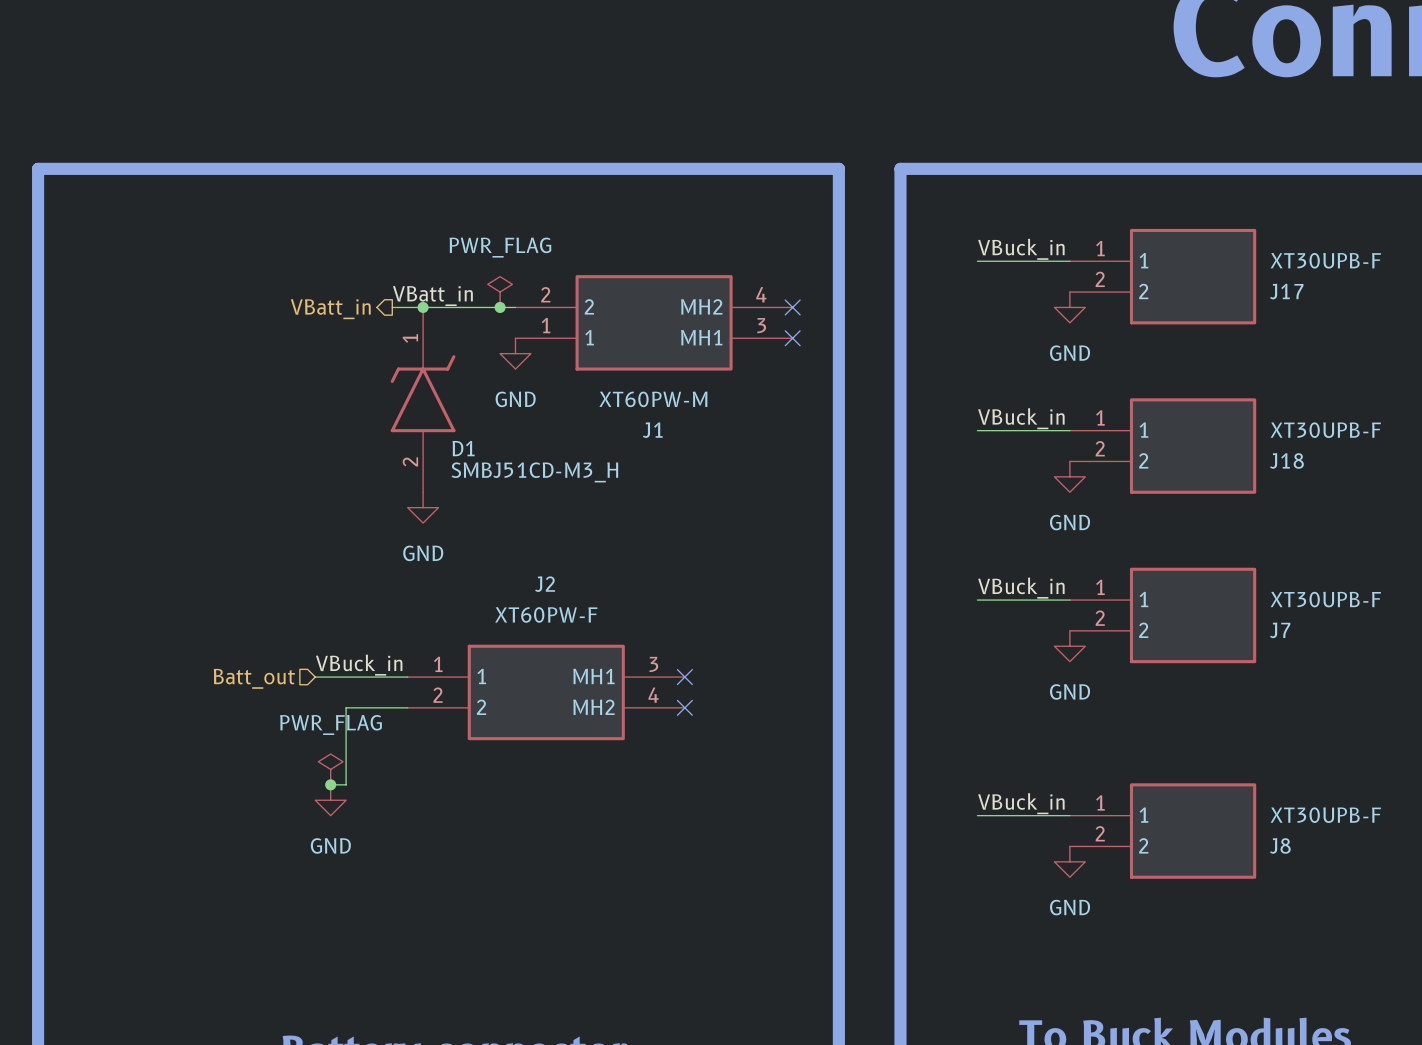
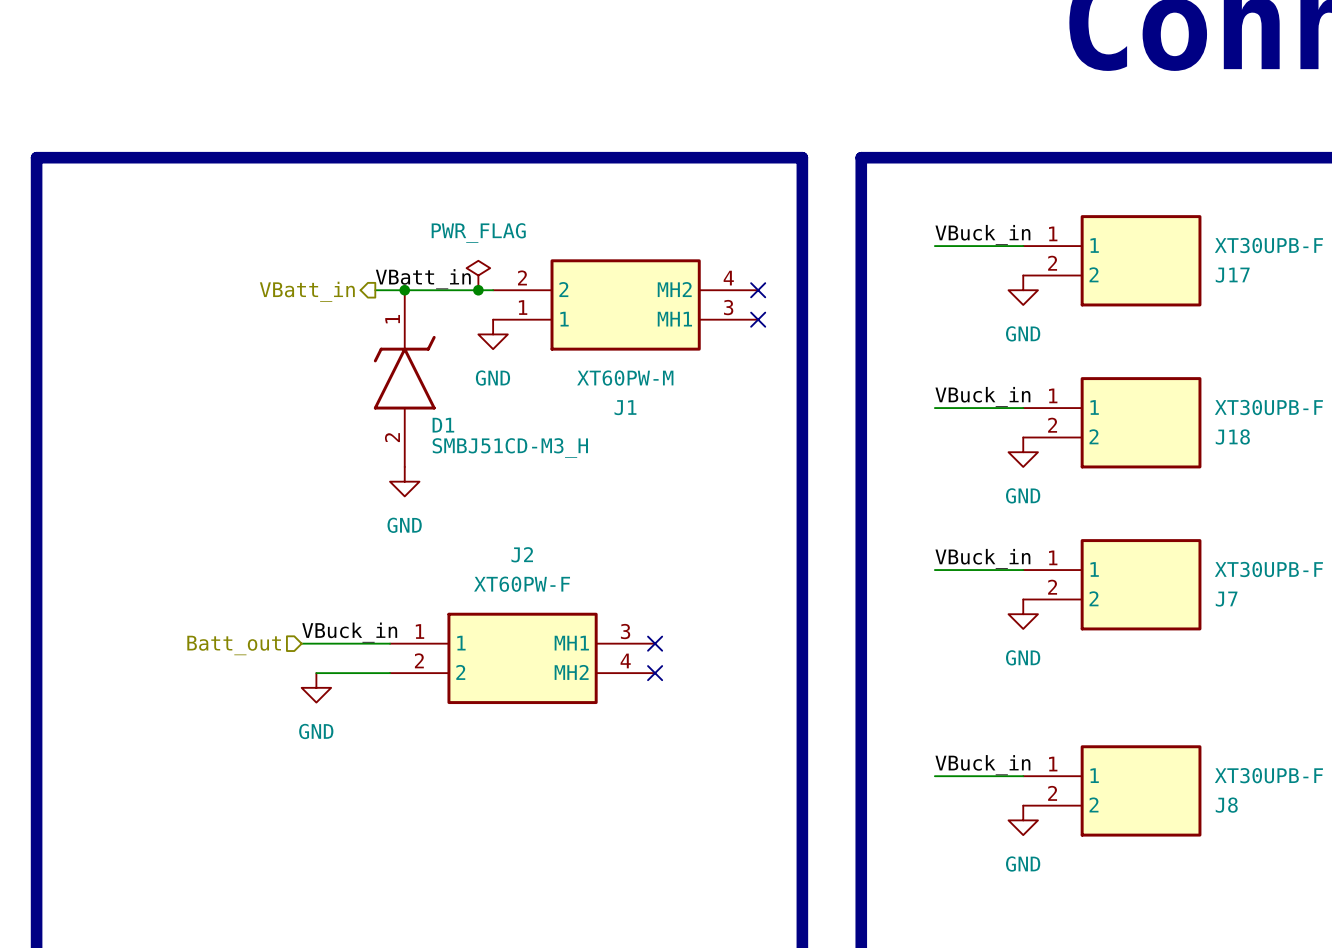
wire: (346, 707) (346, 784) (330, 784) -> (331, 673) (316, 673)
power symbol: PWR_FLAG (330, 769) -> none
junction: (330, 784) -> none
power symbol position: GND (330, 800) -> GND (316, 687)

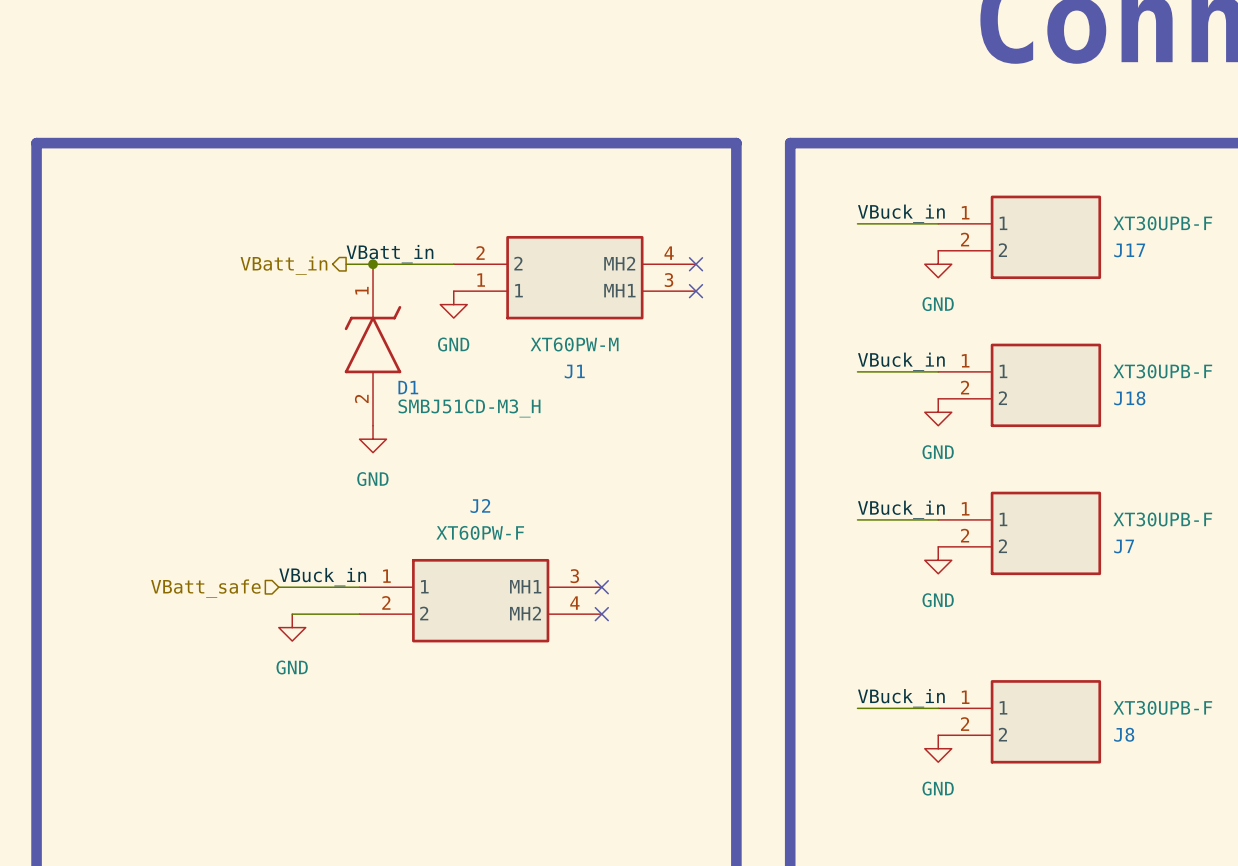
power symbol: PWR_FLAG (478, 275) -> none
junction: (478, 290) -> none
hierarchical label: Batt_out (234, 645) -> VBatt_safe (205, 588)

